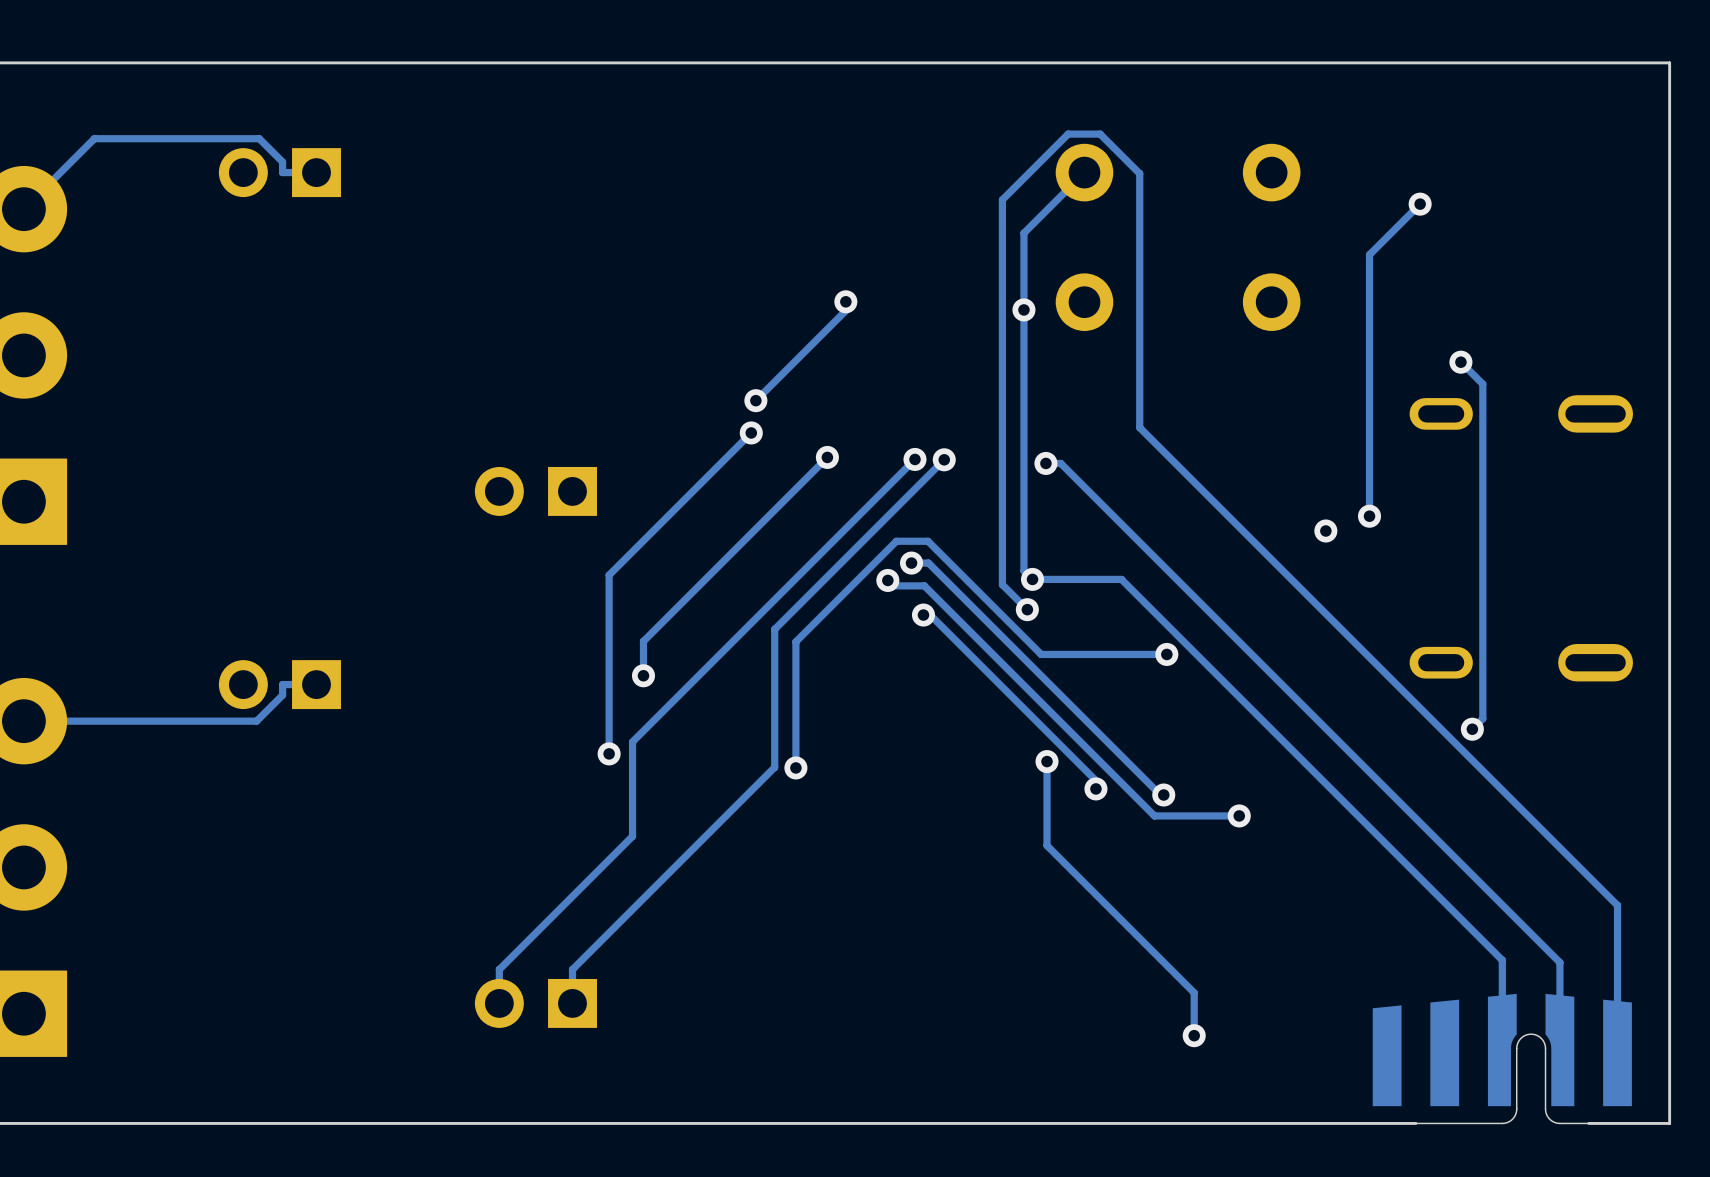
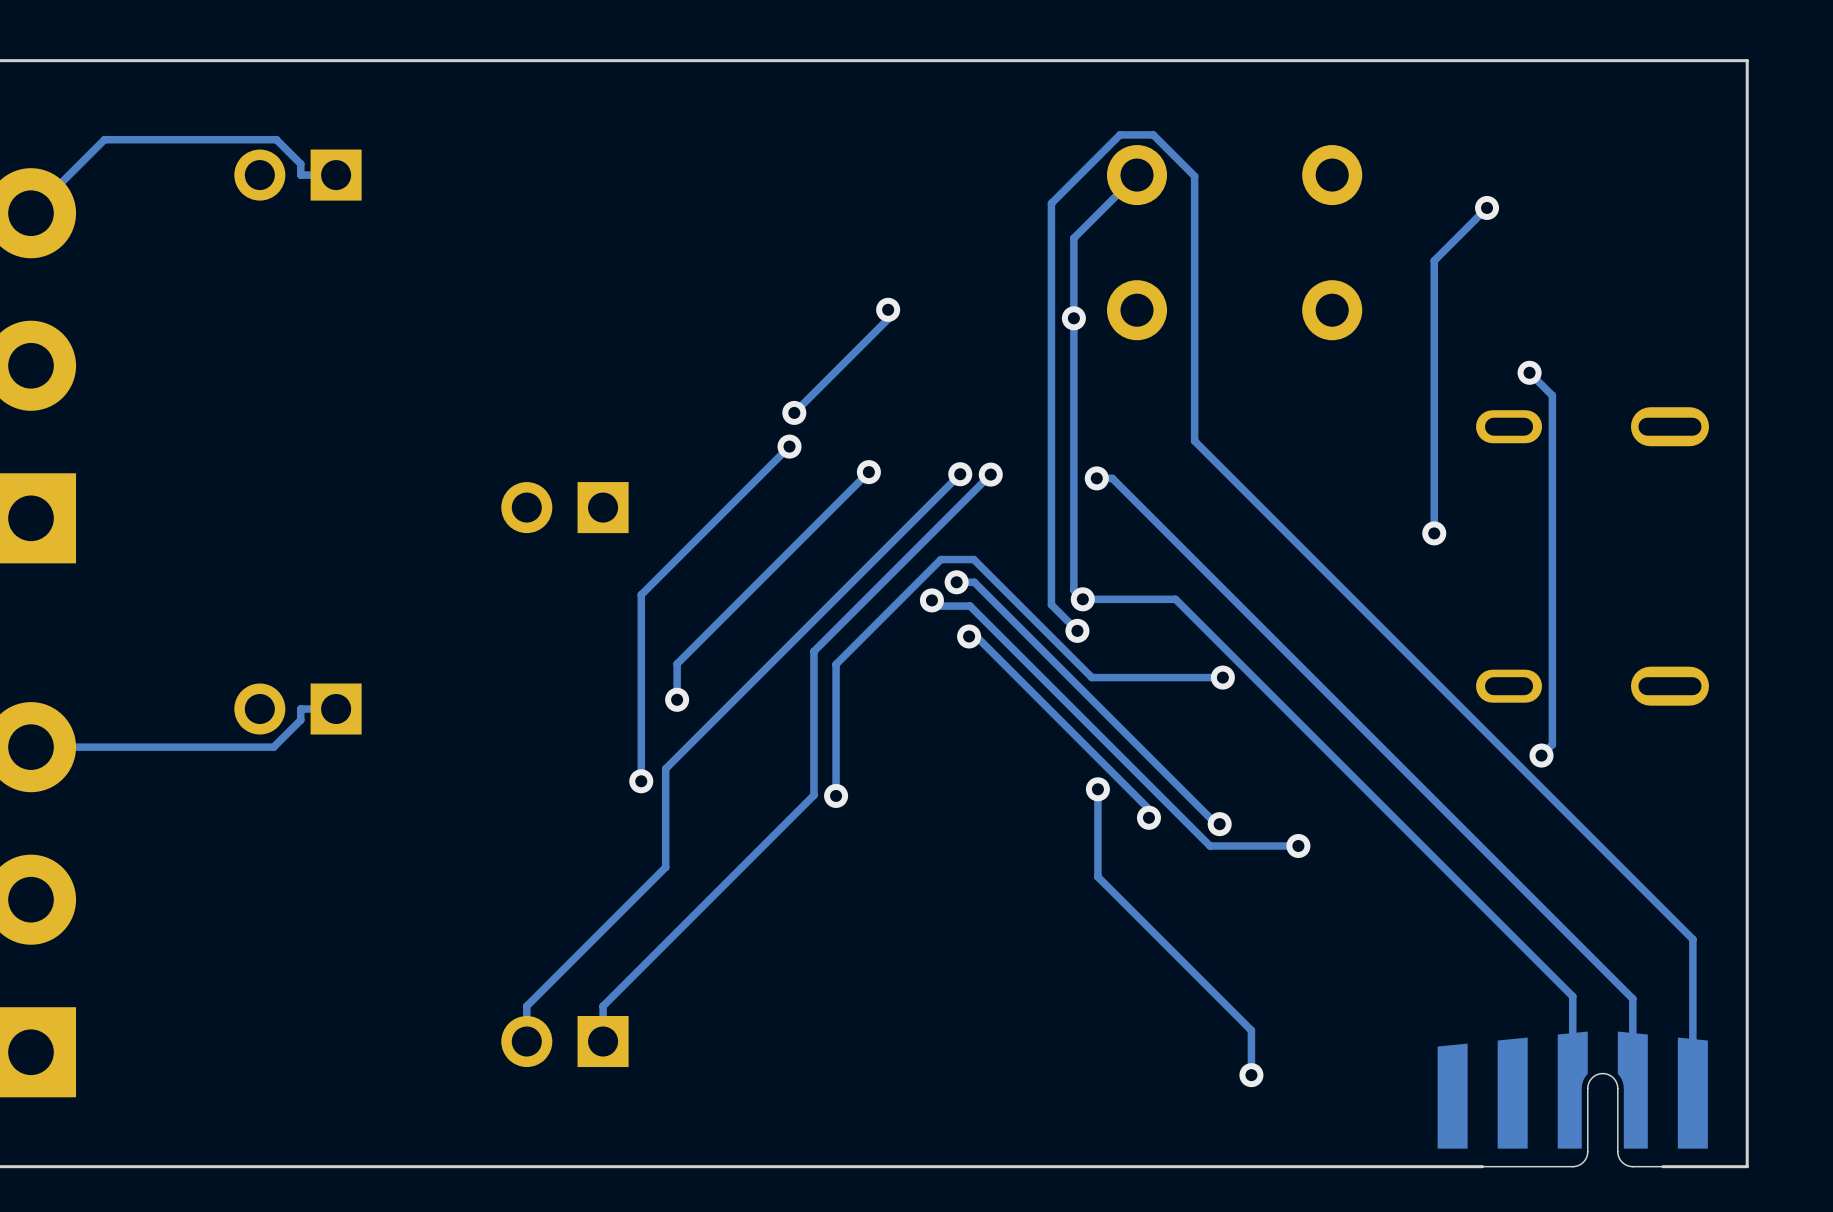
via: (1325, 530) -> none

